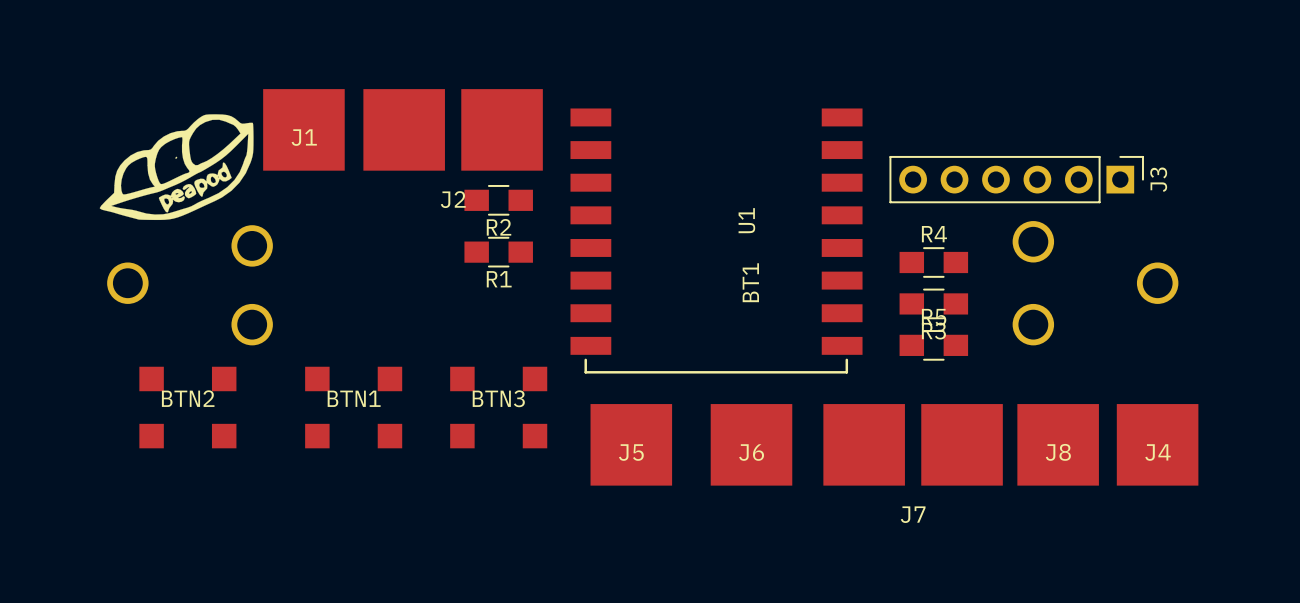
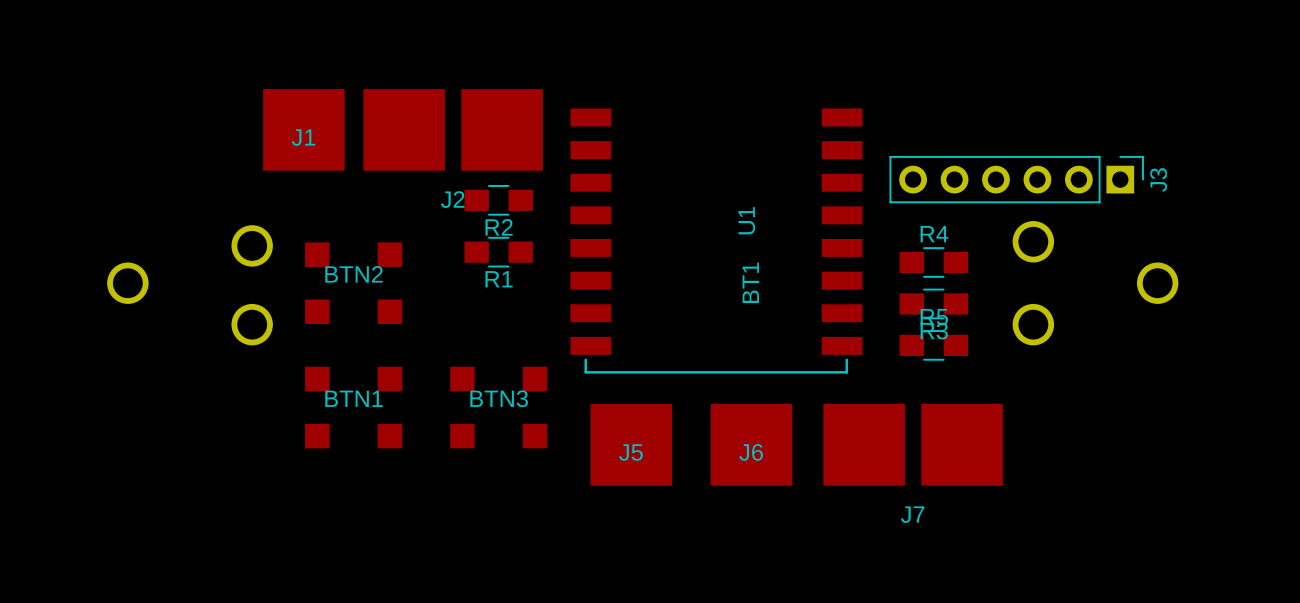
drawing: [99, 114, 254, 221] -> none
BTN2 position: (187, 407) -> (353, 283)
J8: (1058, 444) -> none
J4: (1157, 444) -> none

